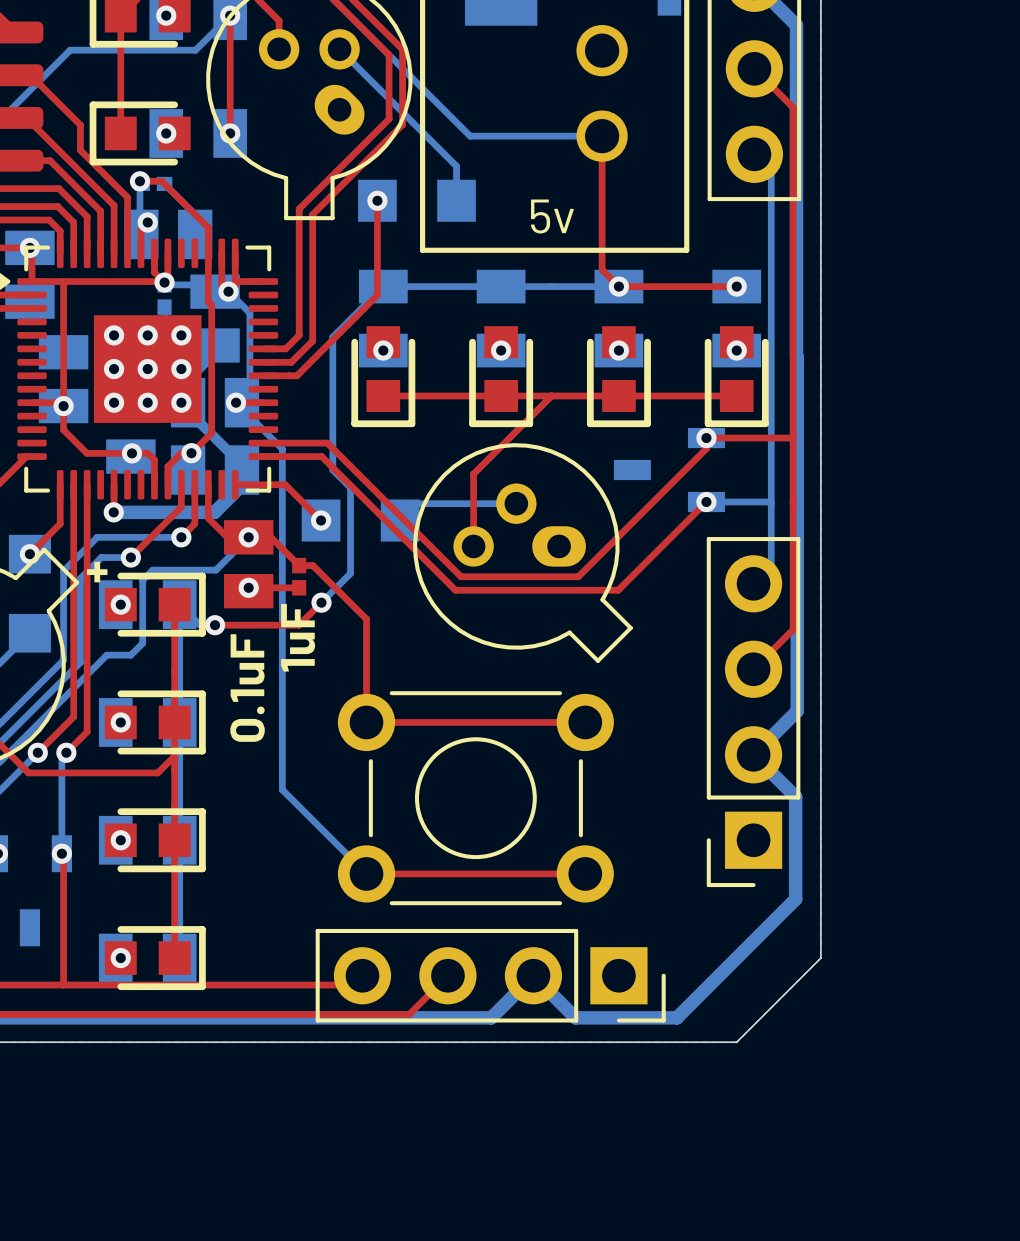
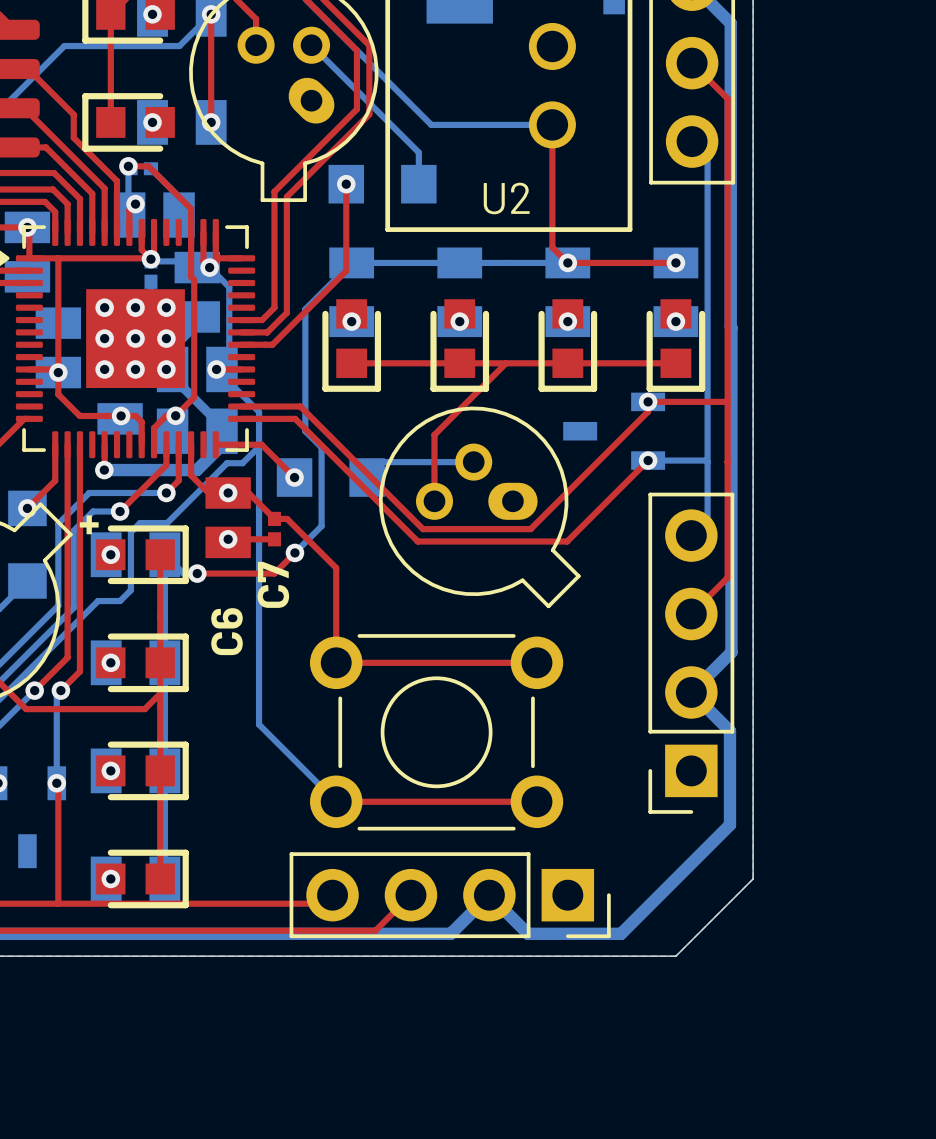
5v name: 5v (552, 216) -> U2 (506, 198)
bottom track: (248, 537) (215, 570) (182, 570) -> (259, 446) (242, 463) (227, 463) (167, 523)
1uF name: 1uF (298, 637) -> C7 (273, 584)
0.1uF name: 0.1uF (247, 688) -> C6 (227, 631)

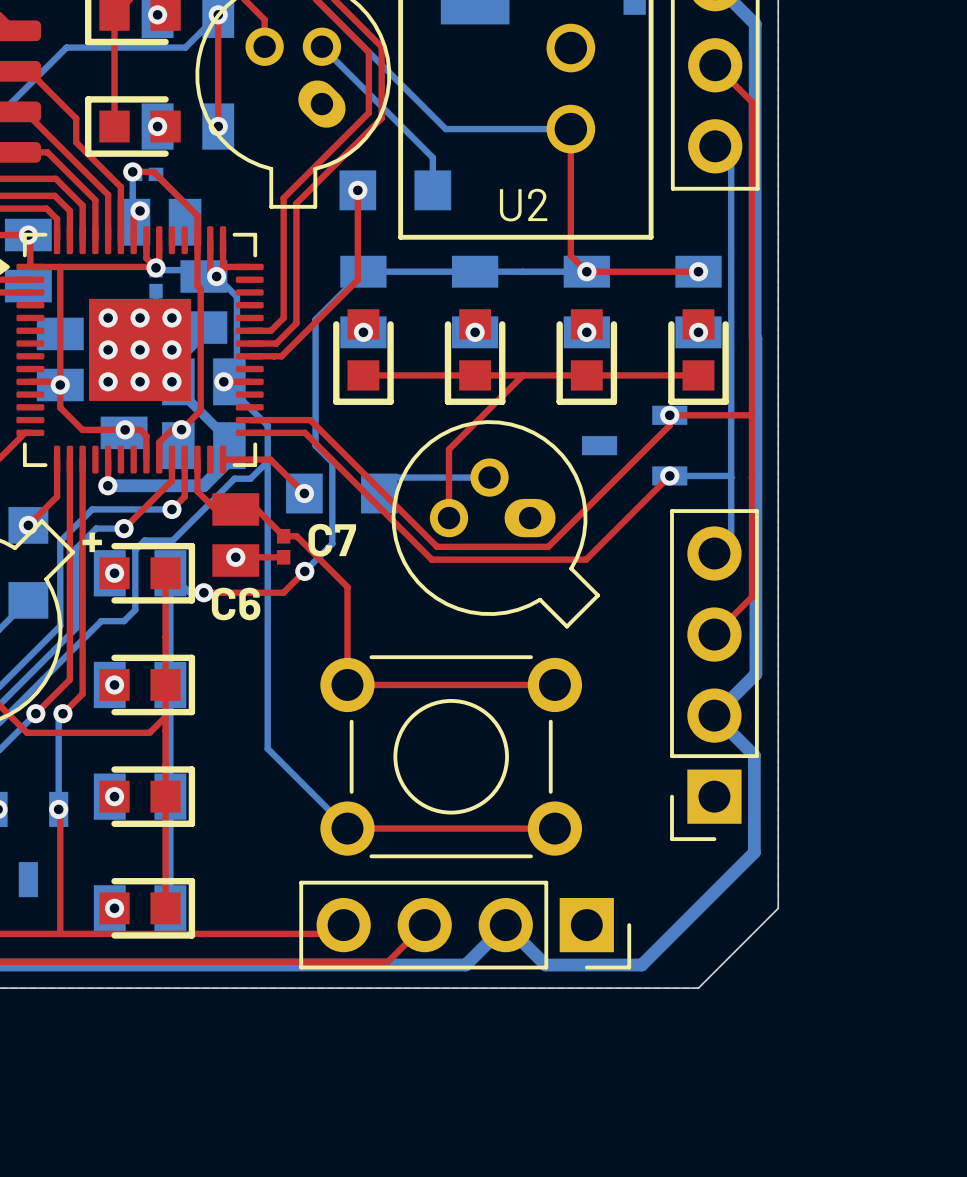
via: (228, 492) -> none
C7 name rotation: 0° (273, 584) -> 90° clockwise (332, 540)
C6 name rotation: 0° (227, 631) -> 90° clockwise (236, 604)

